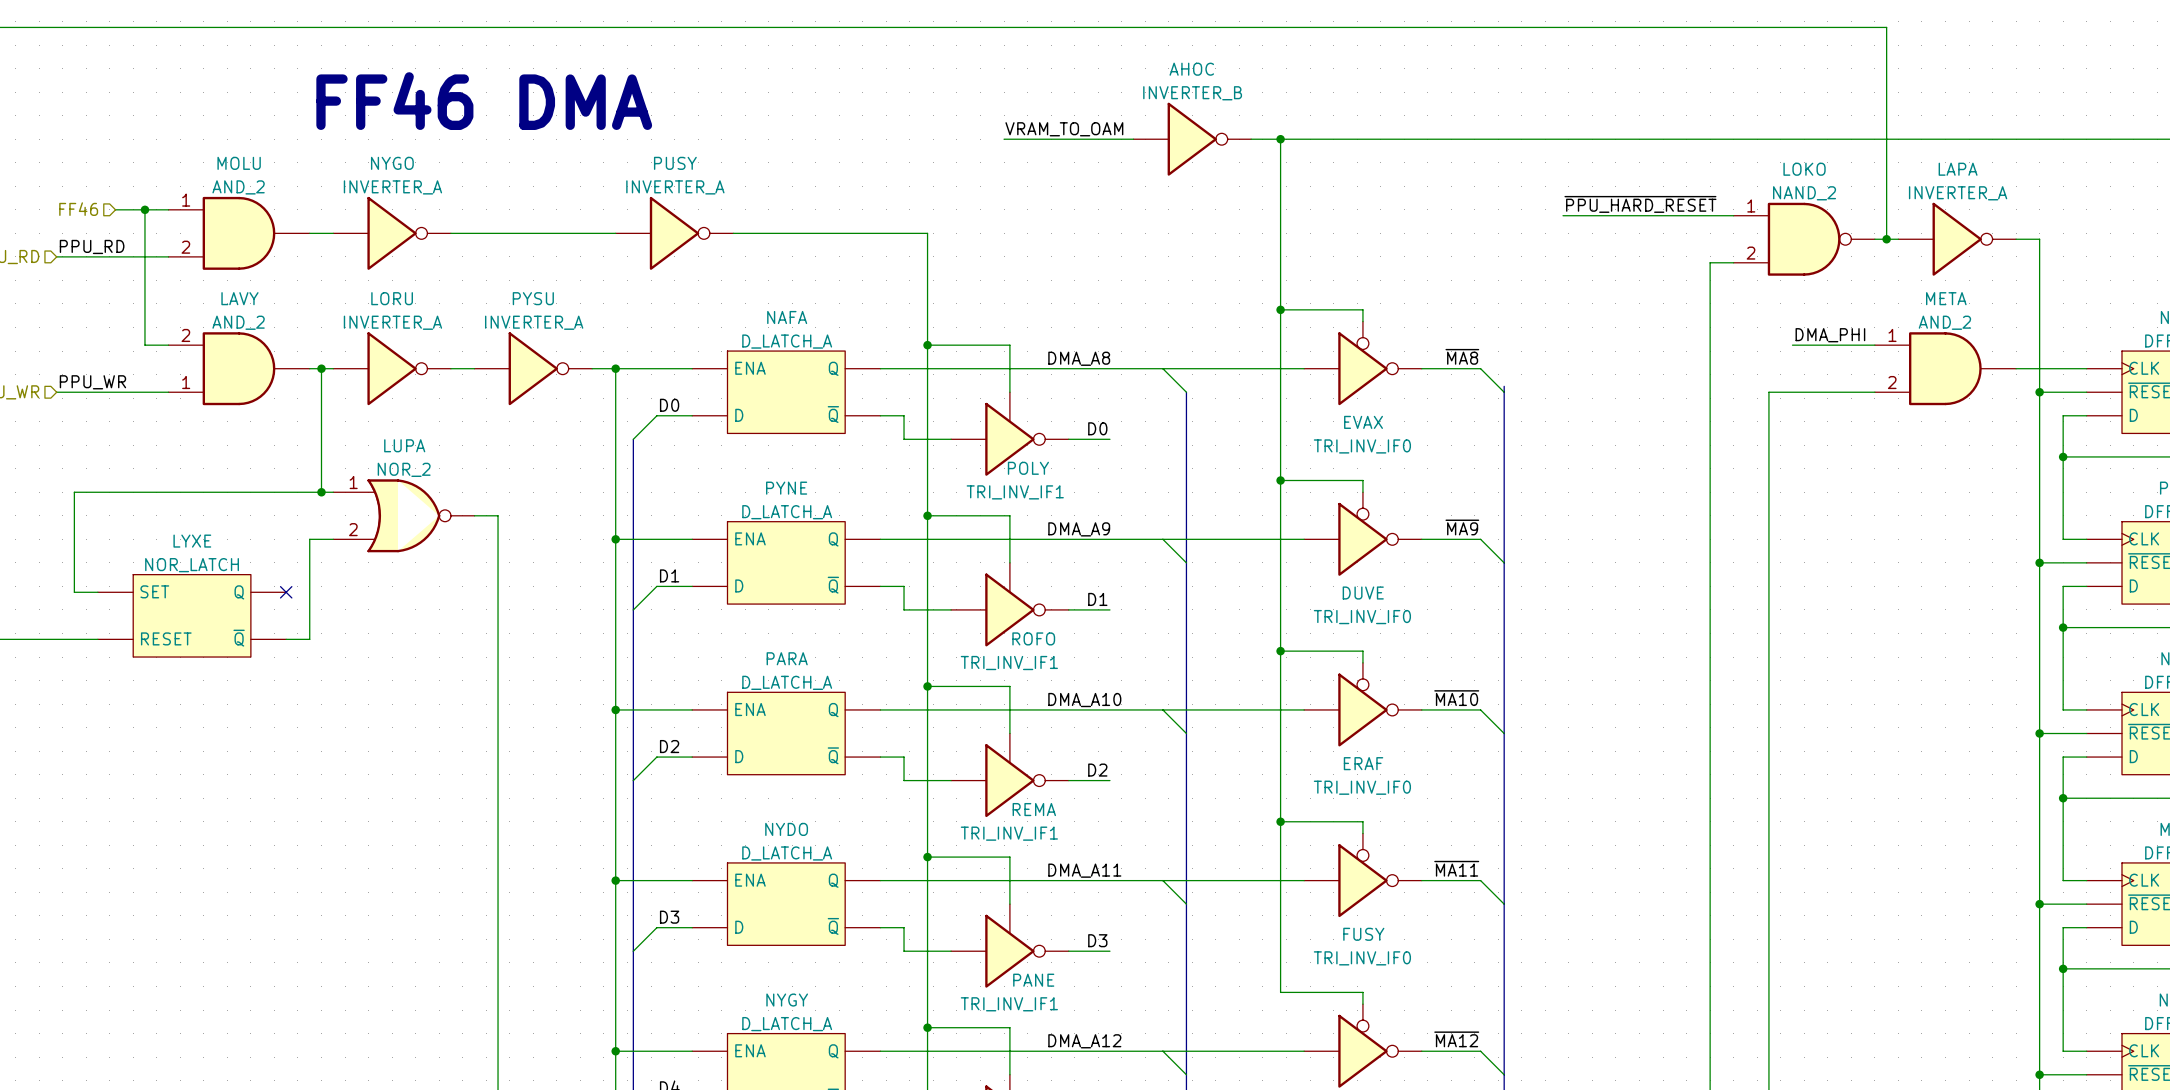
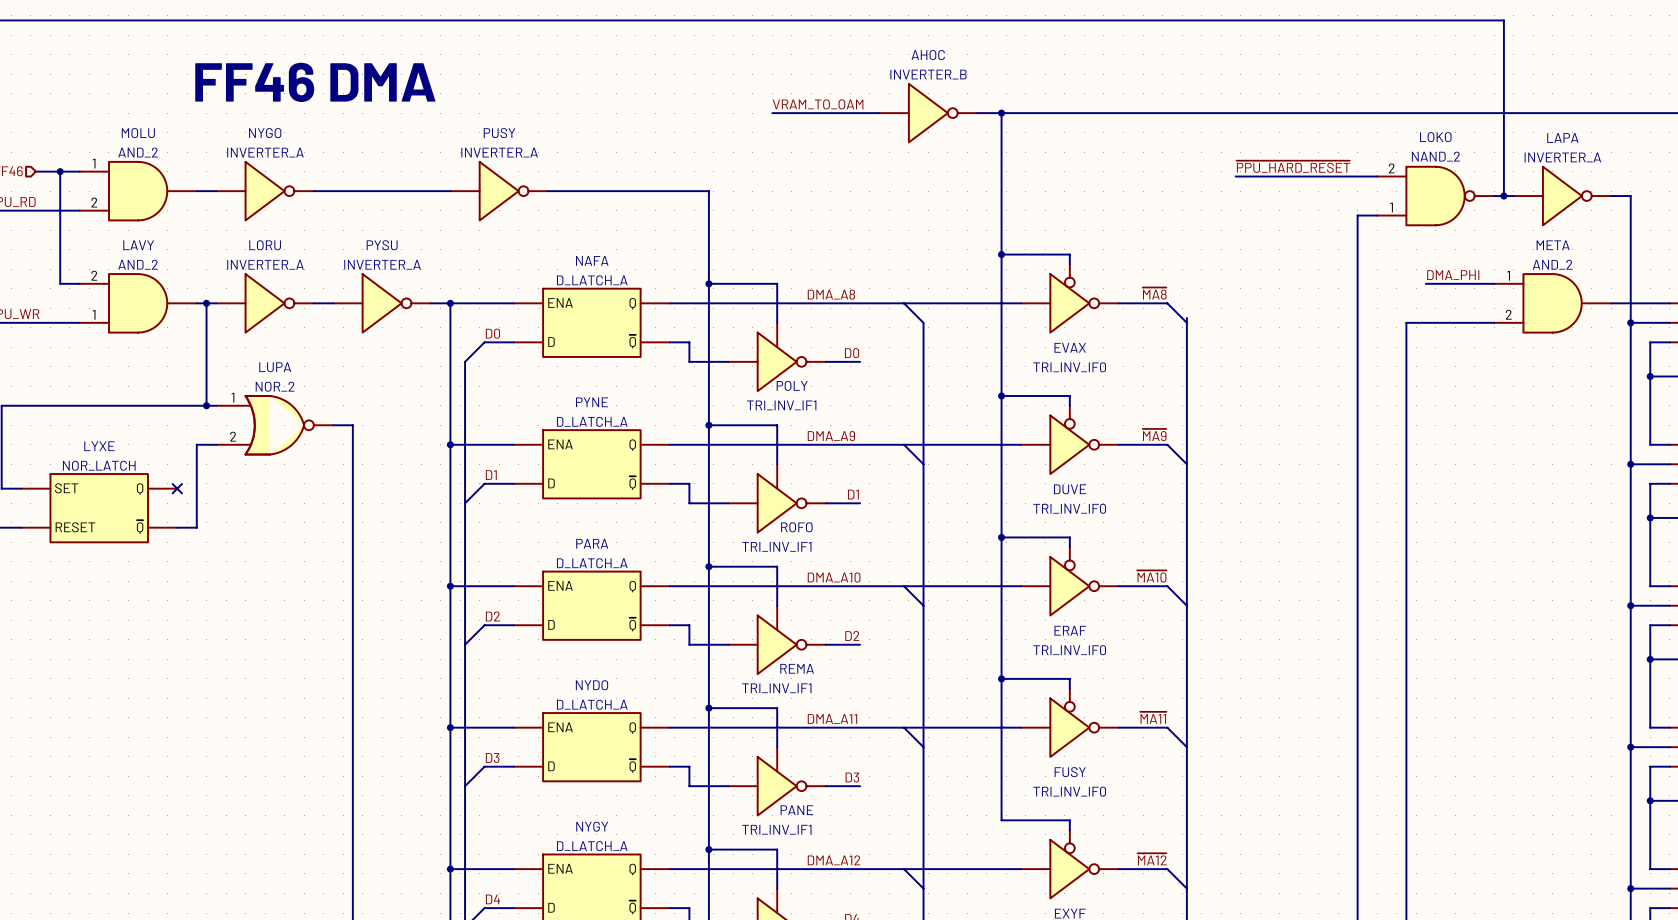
LOKO flip: as is (1804, 239) -> up-down (1435, 196)

